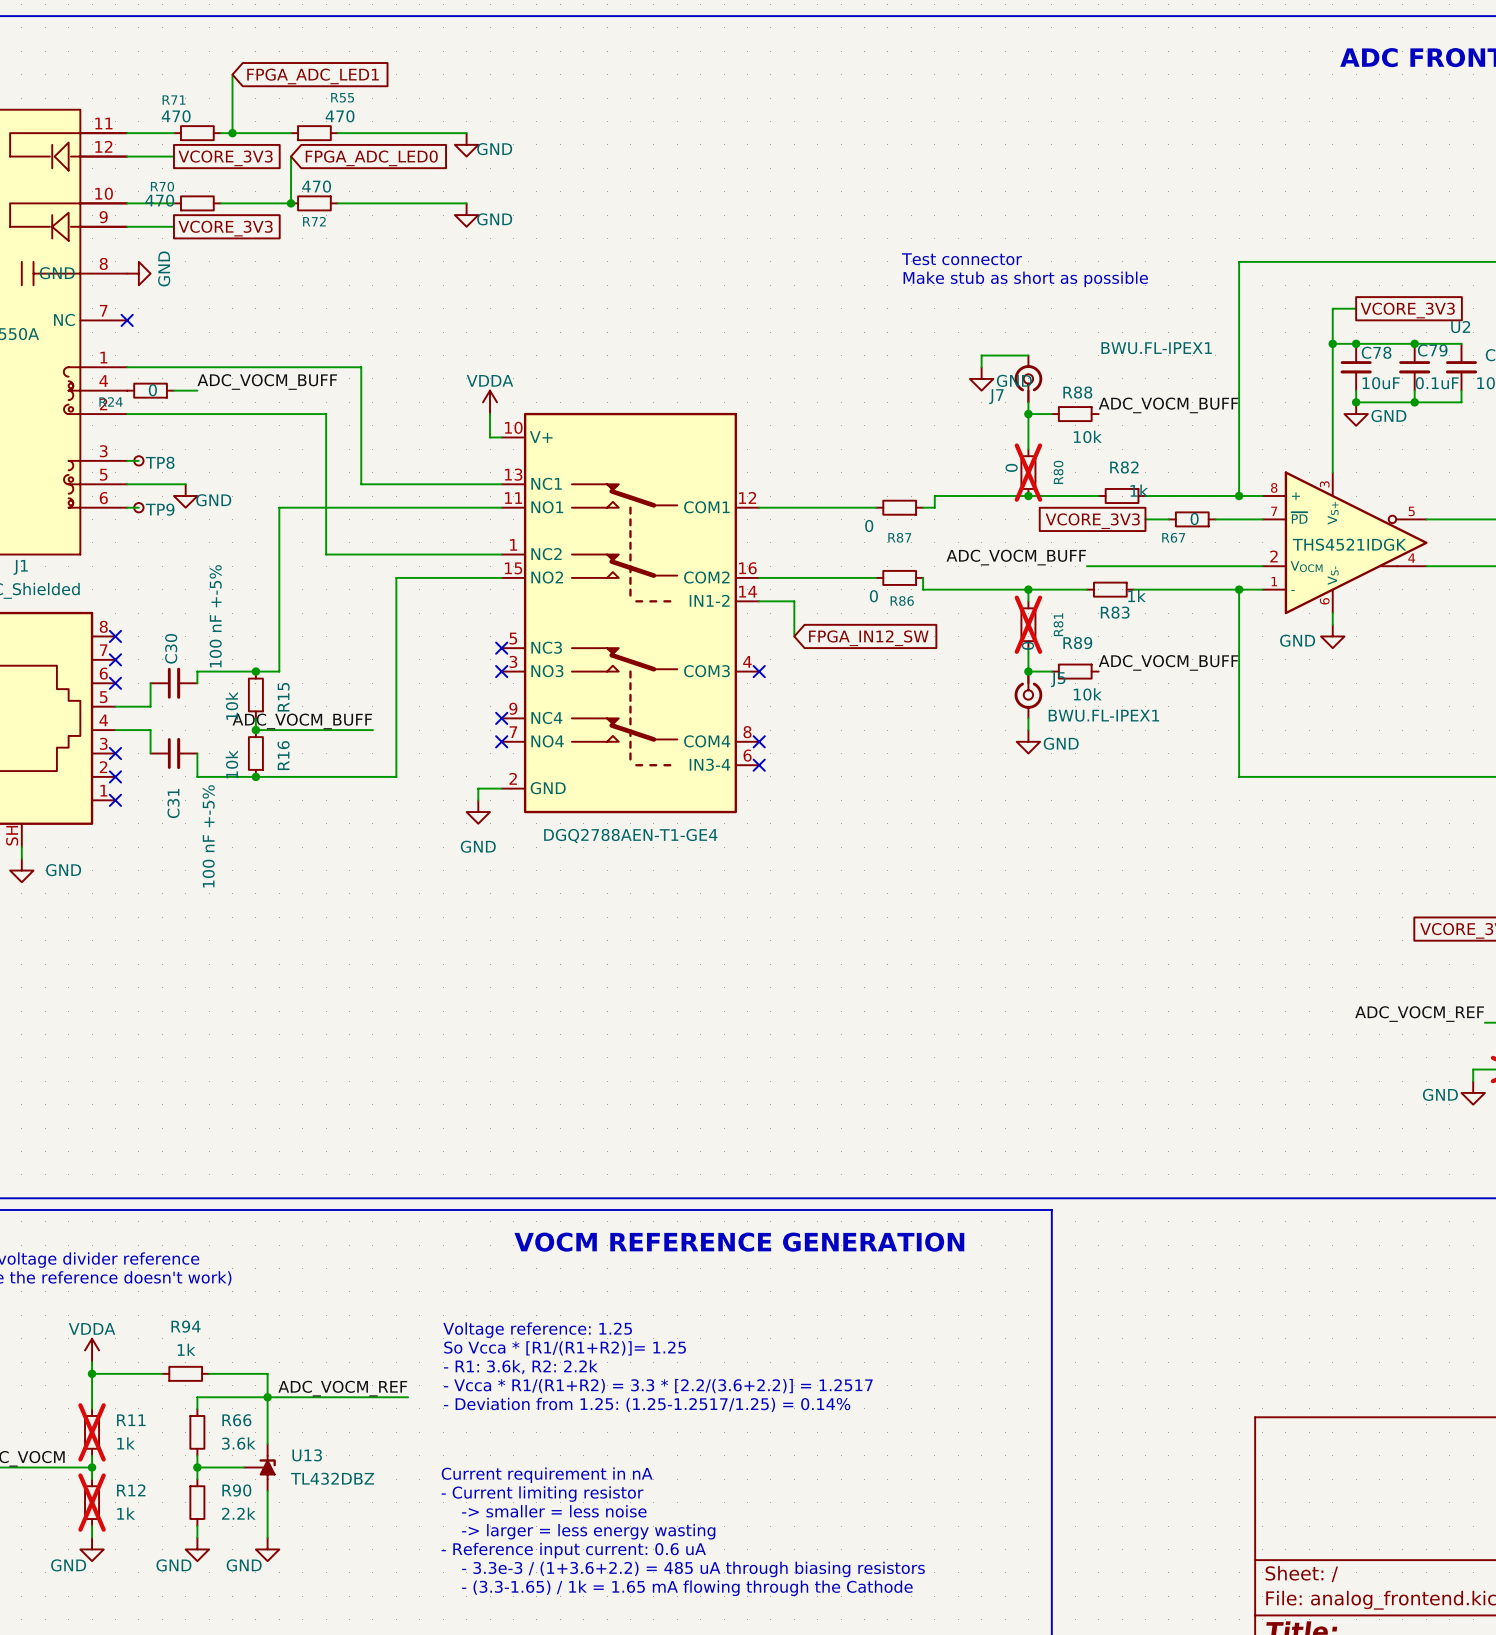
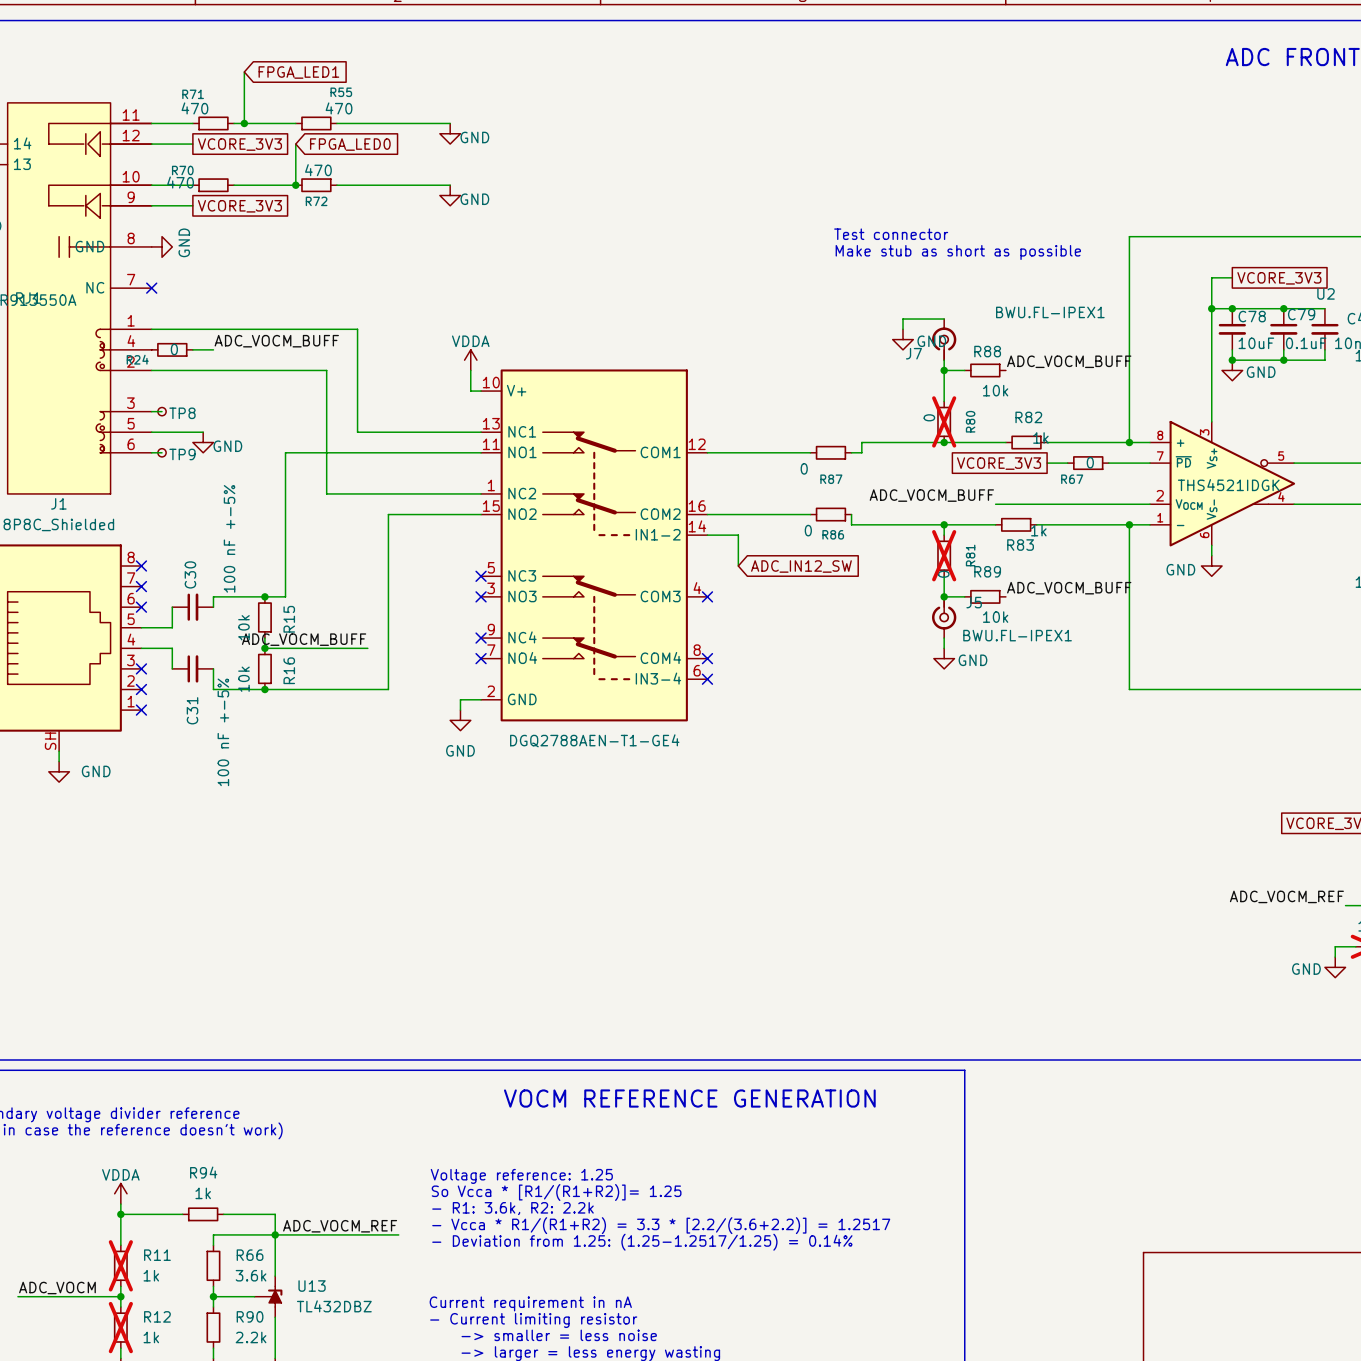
global label: FPGA_ADC_LED1 (313, 76) -> FPGA_LED1 (298, 72)
global label: FPGA_ADC_LED0 (371, 158) -> FPGA_LED0 (350, 144)
global label: FPGA_IN12_SW (868, 638) -> ADC_IN12_SW (801, 566)

